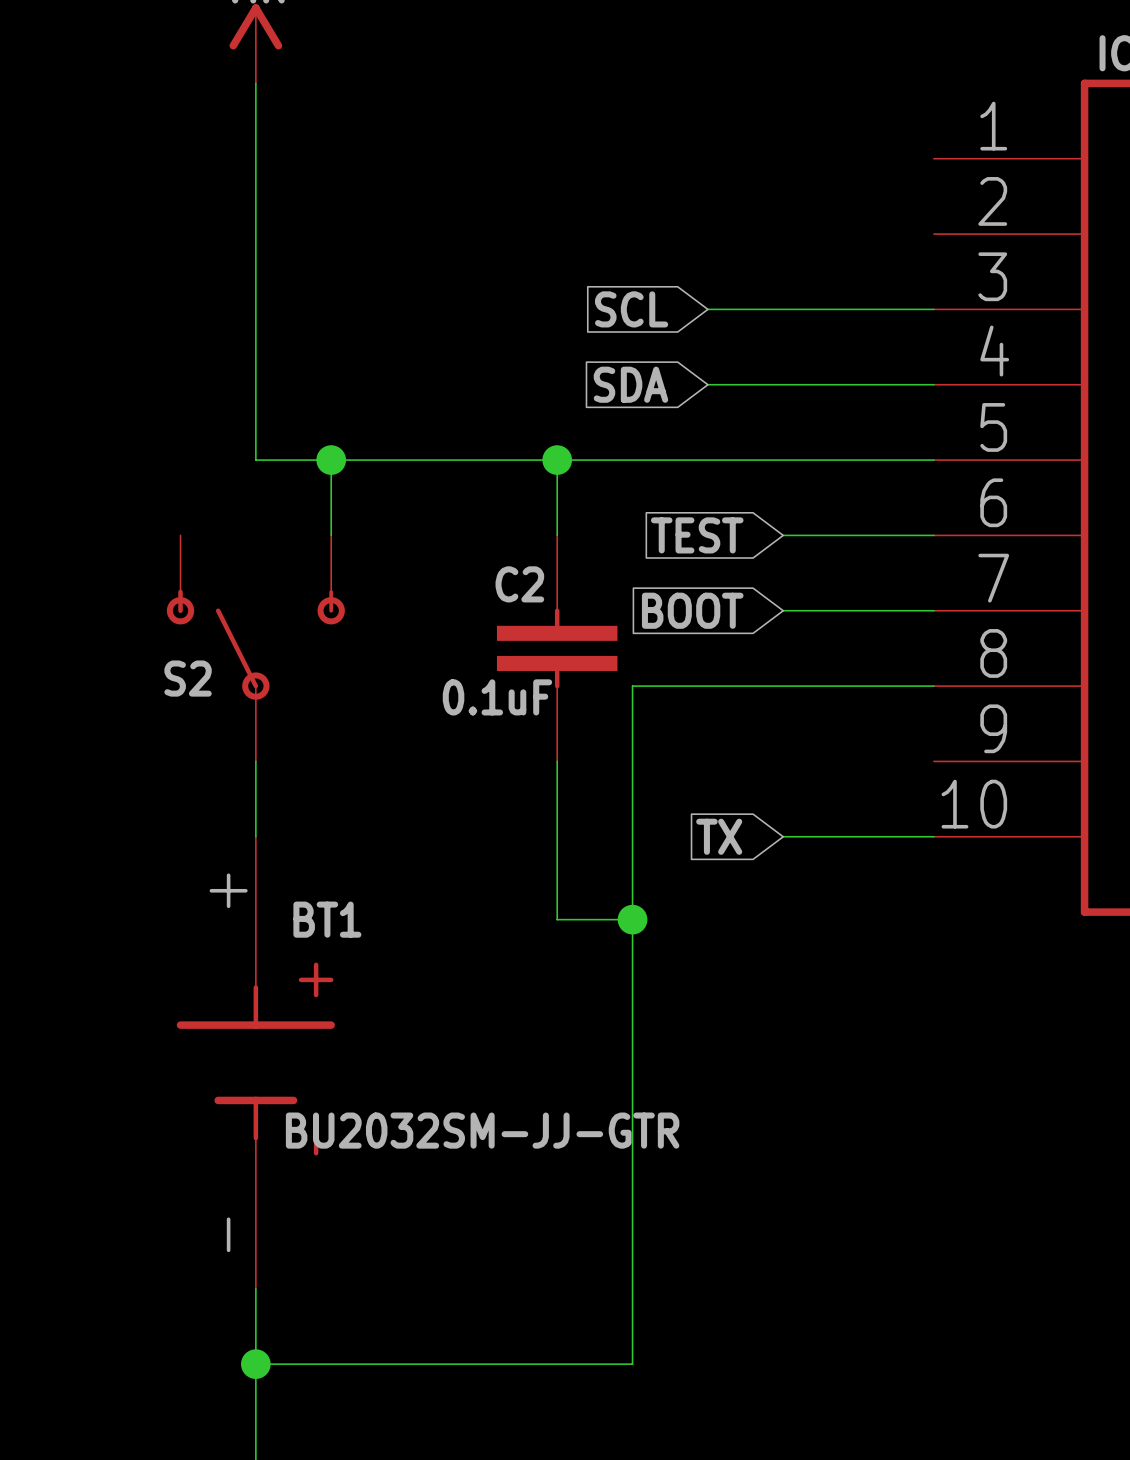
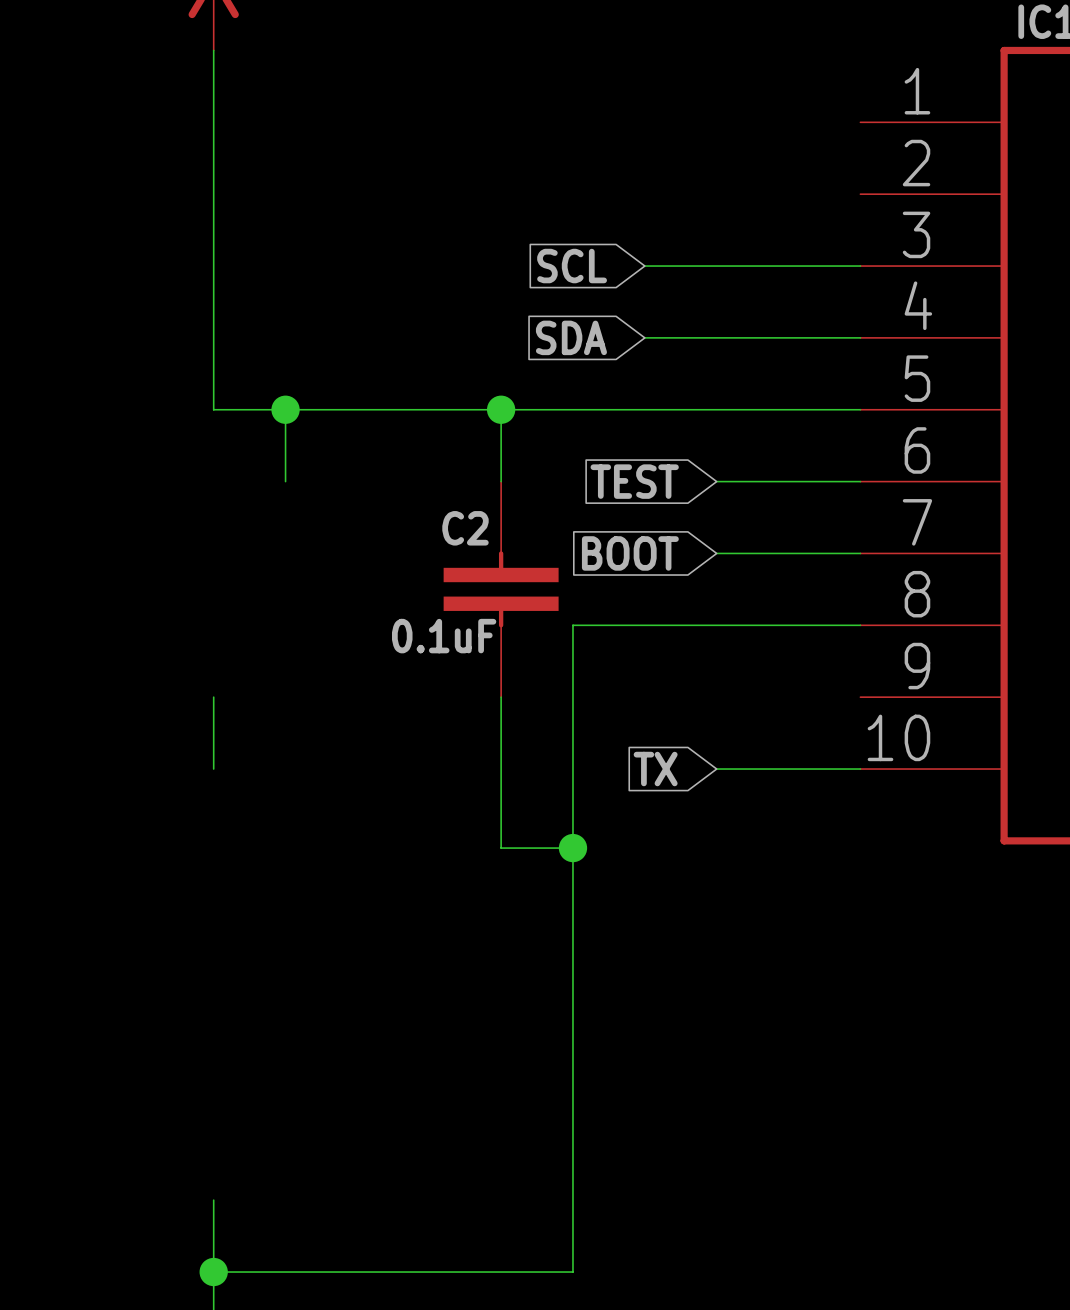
S2: (255, 648) -> none
BT1: BU2032SM-JJ-GTR (255, 1062) -> none

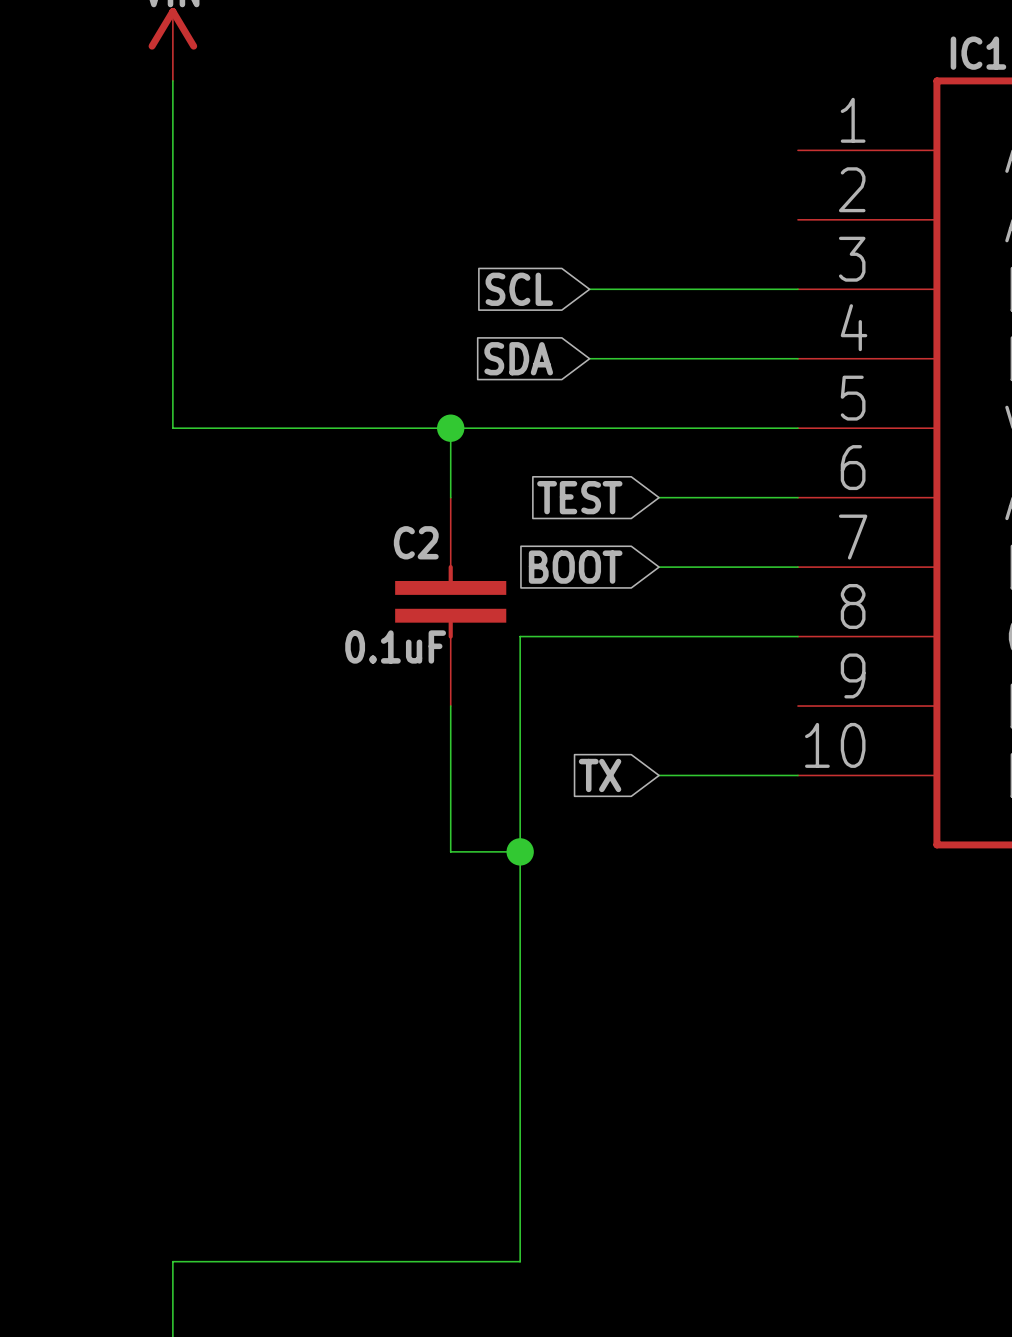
wire: (285, 409) (285, 481) -> none
junction: (285, 409) -> none
wire: (213, 697) (213, 769) -> none
wire: (213, 1200) (213, 1272) -> none
junction: (213, 1272) -> none

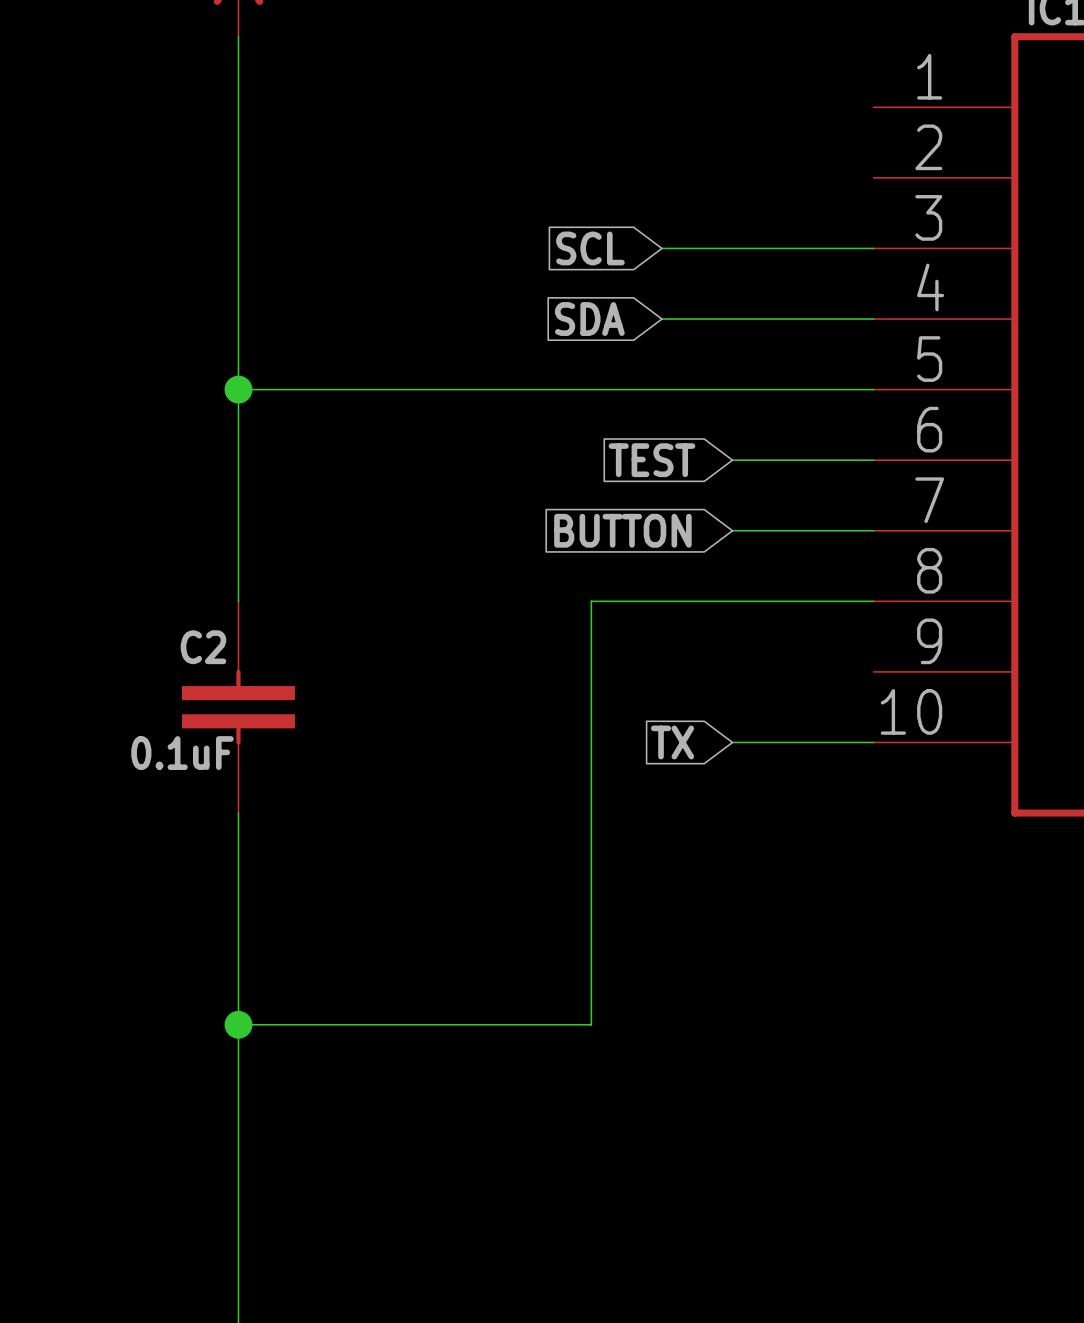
wire: none -> (238, 389) (238, 601)
junction: none -> (238, 389)
wire: (450, 428) (450, 497) -> none
junction: (450, 428) -> none
global label: BOOT (575, 567) -> BUTTON (622, 530)
C2 position: (450, 601) -> (238, 707)
wire: (450, 706) (450, 851) (520, 851) -> none
wire: none -> (238, 813) (238, 1236)
junction: (520, 851) -> none
junction: none -> (238, 1024)
wire: (520, 1053) (520, 1261) (172, 1261) -> (591, 1024) (238, 1024)

